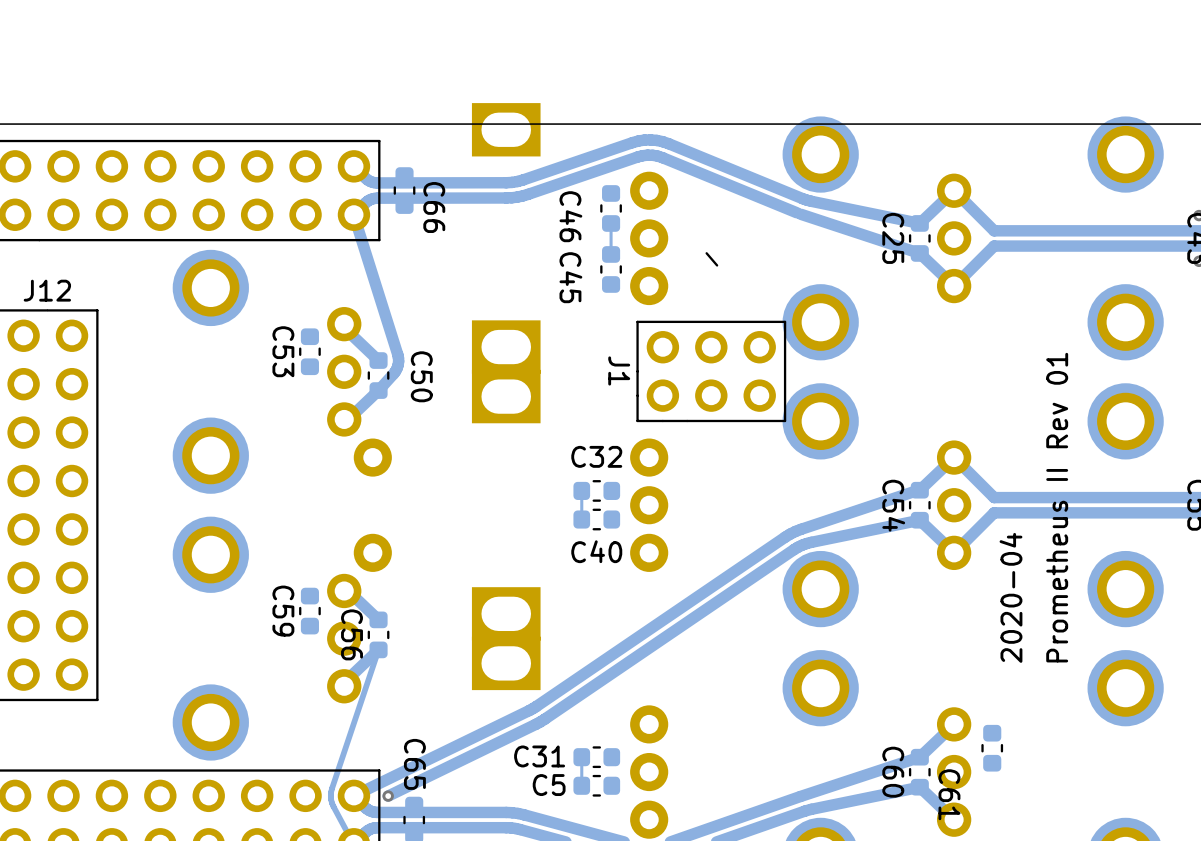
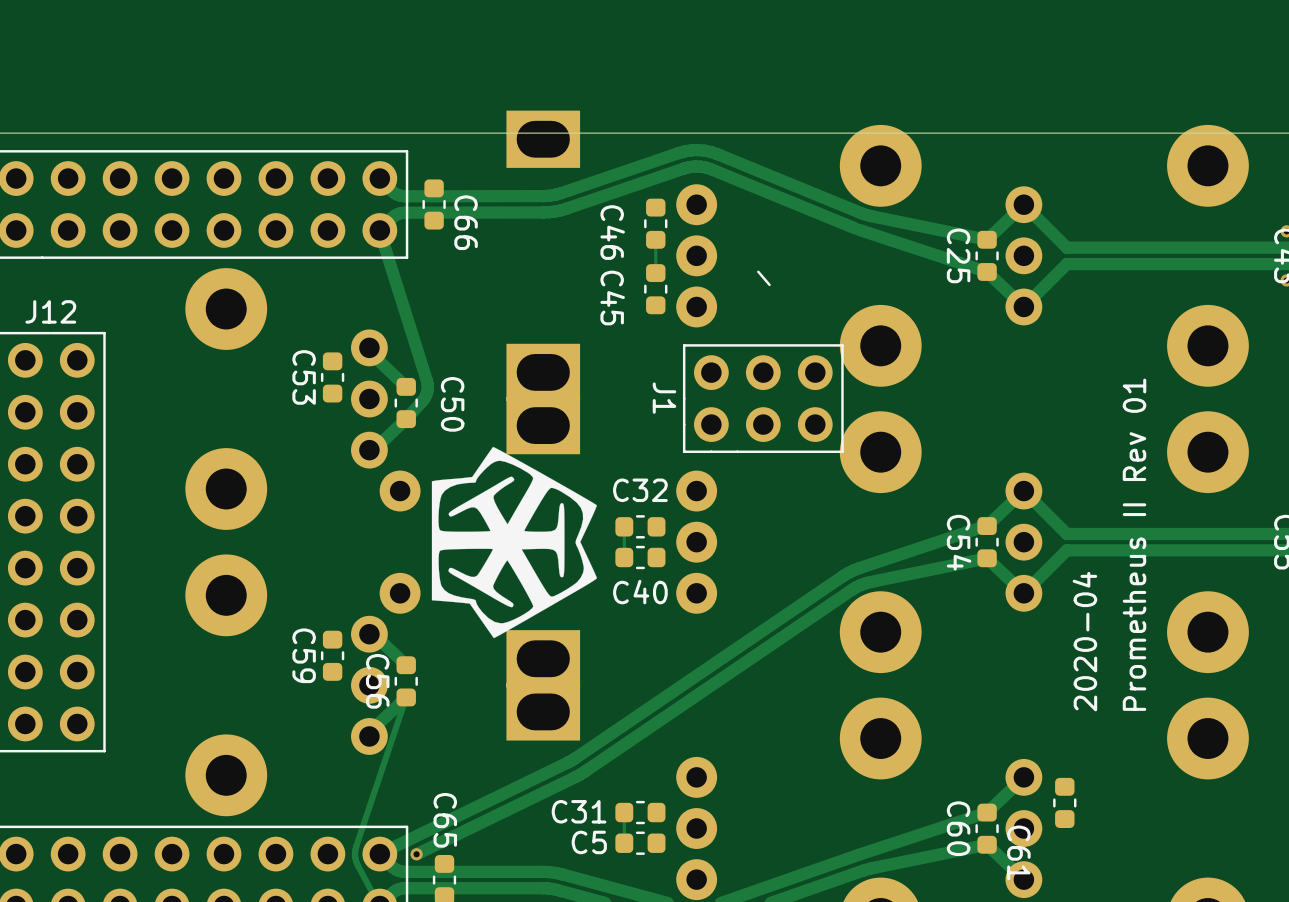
drawing: none -> [431, 446, 598, 639]

